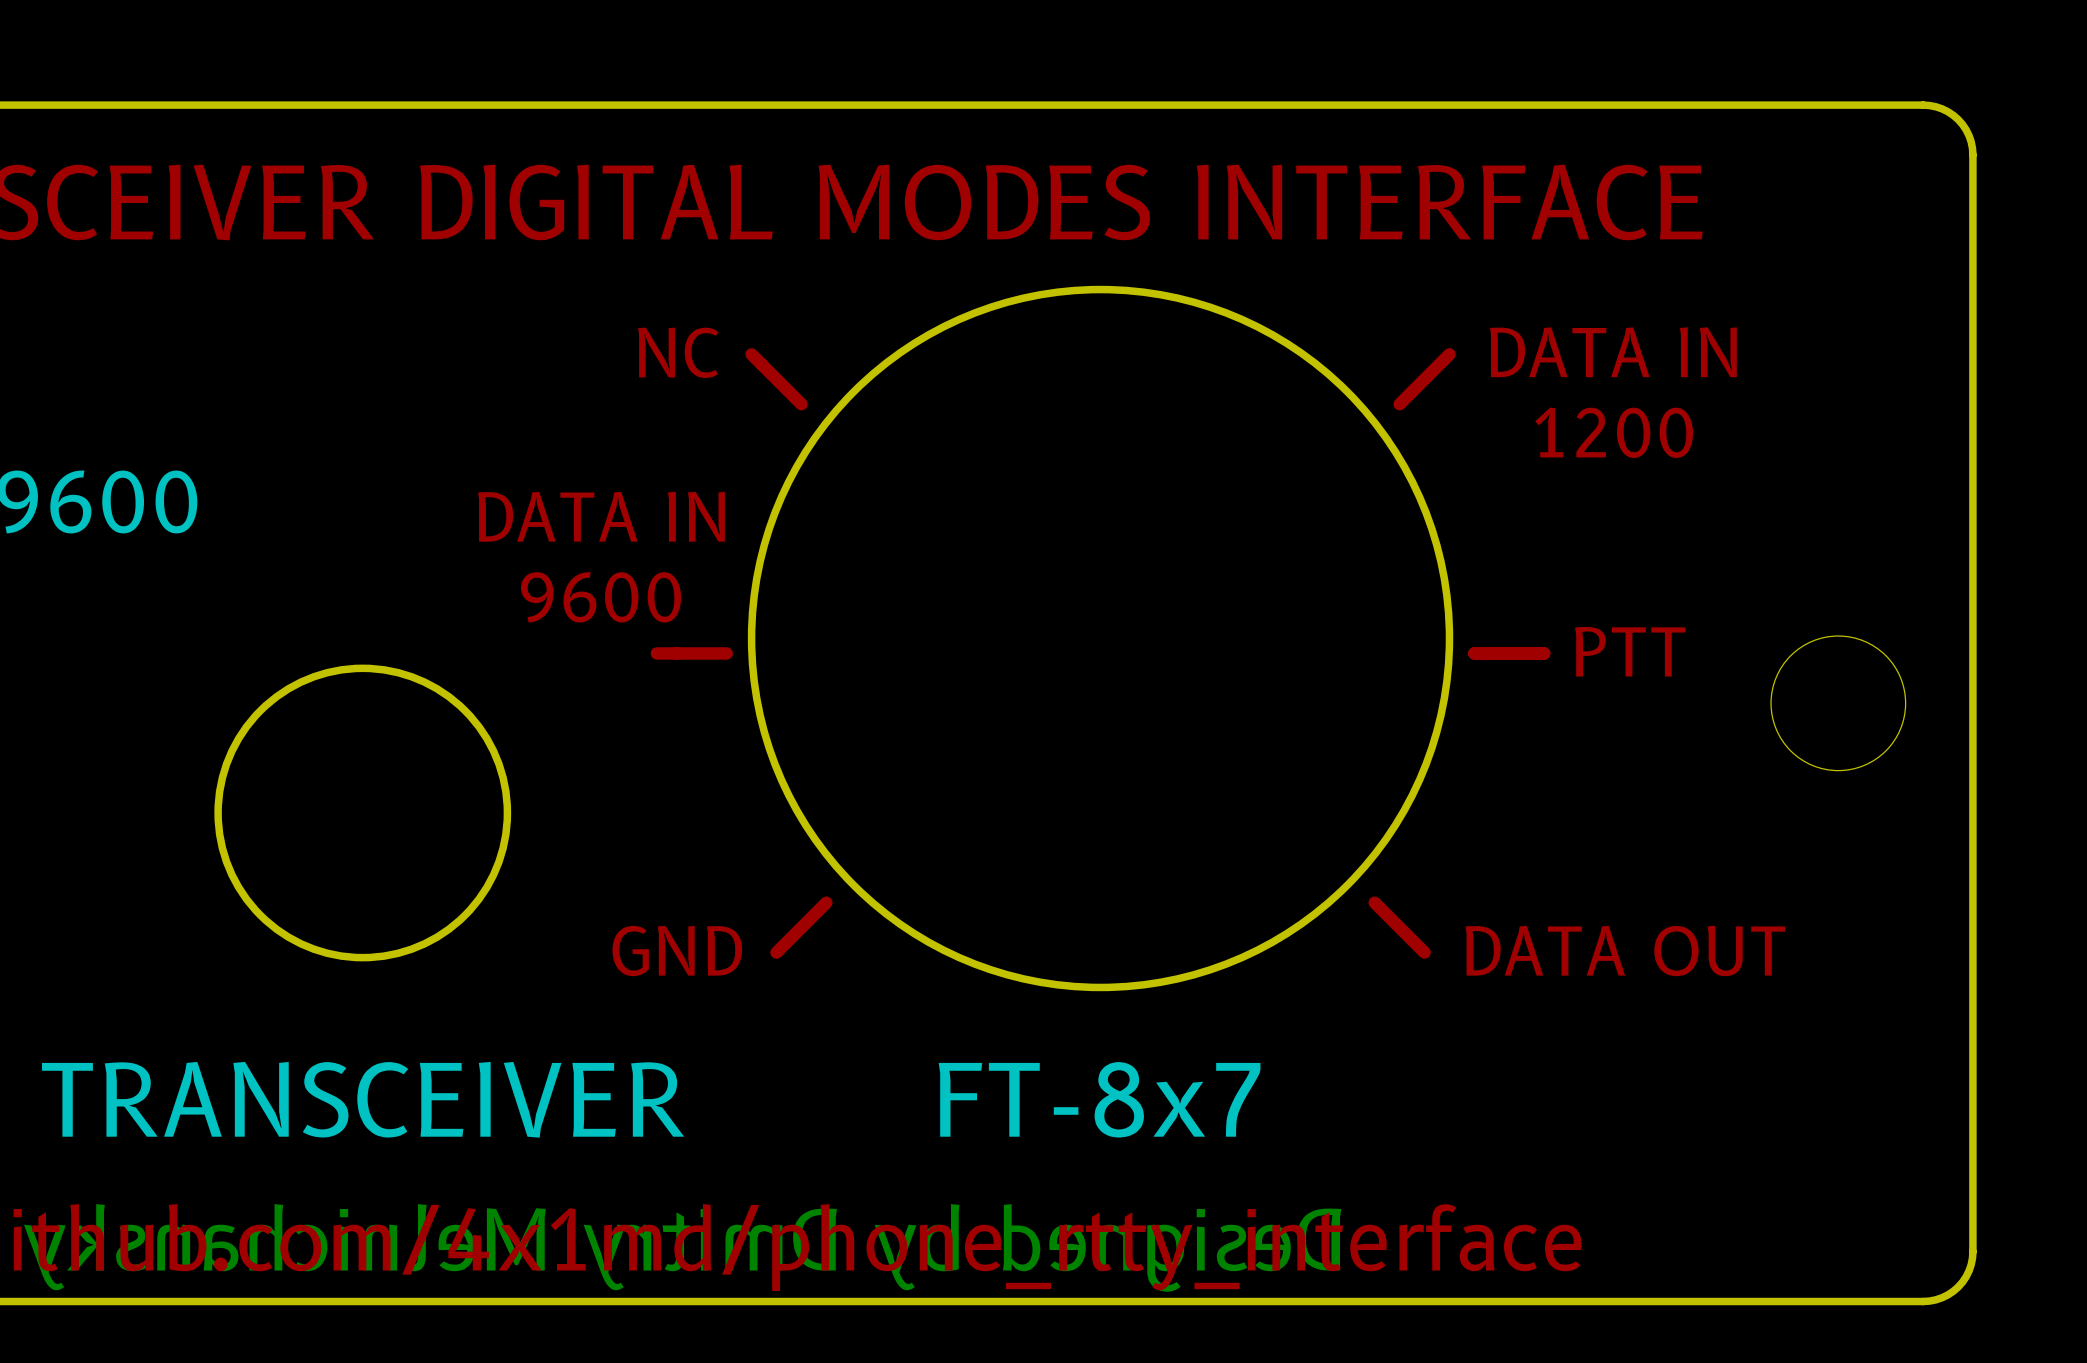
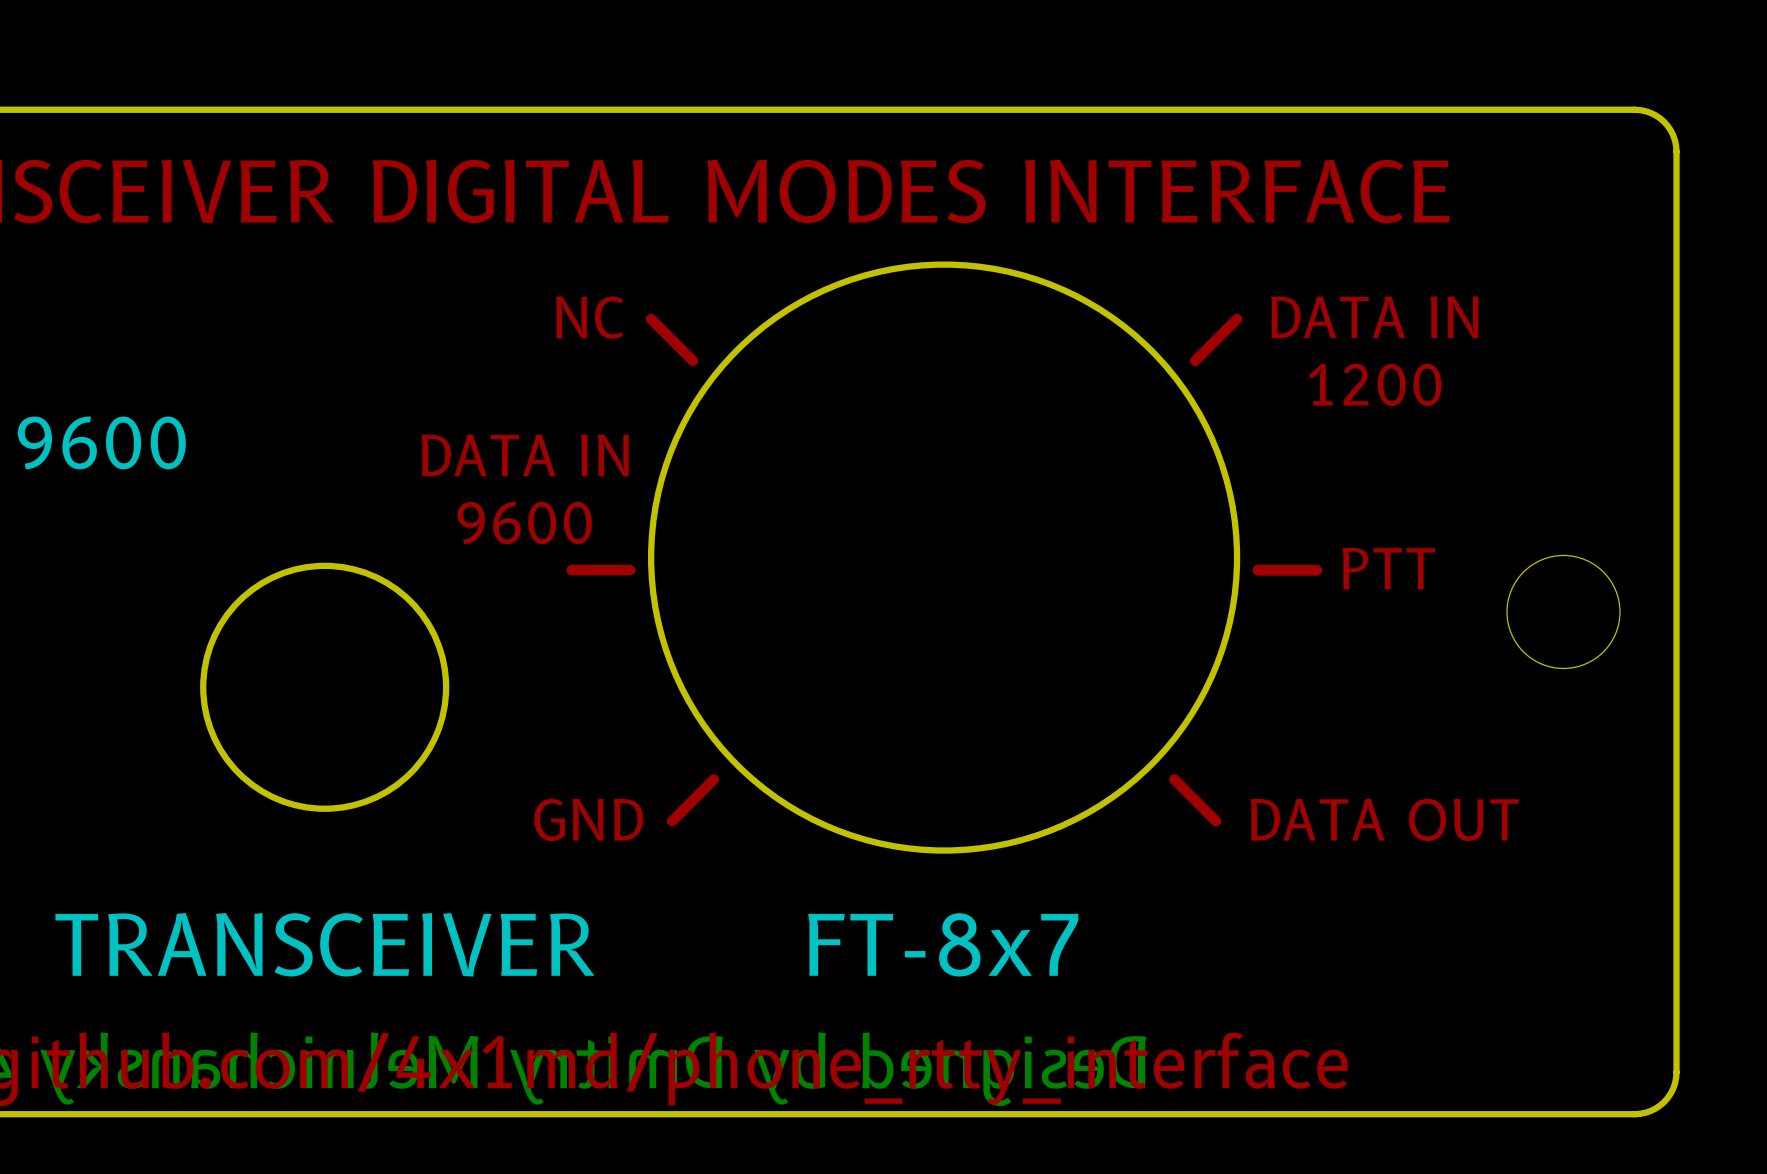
round board edge position: (362, 812) -> (324, 687)

